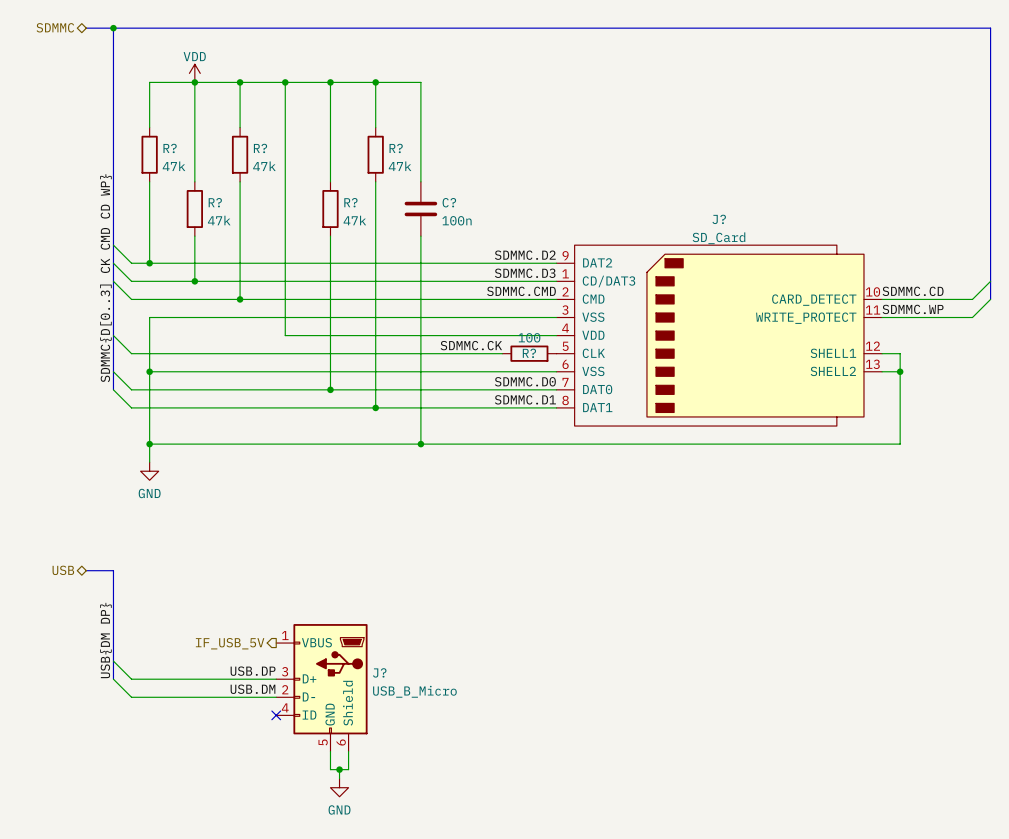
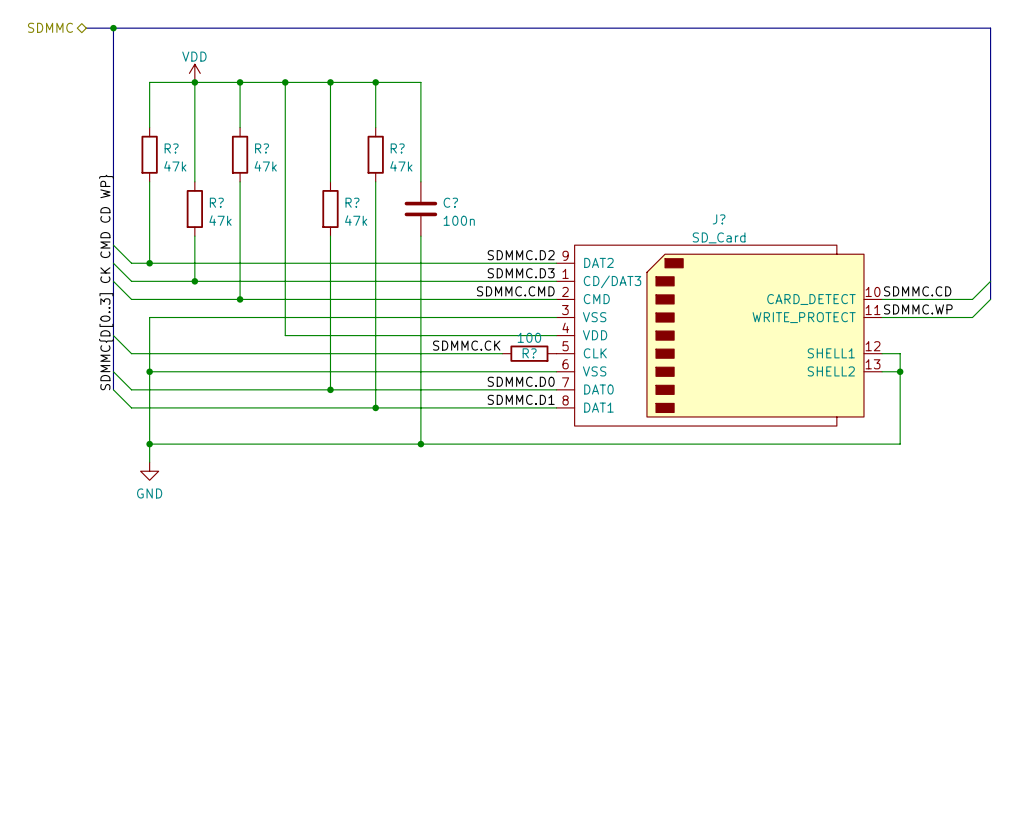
hierarchical label: USB (63, 570) -> none
bus: (86, 570) (113, 570) (113, 679) -> none
label: USB{DM DP} (105, 640) -> none
hierarchical label: IF_USB_5V (230, 643) -> none
wire: (113, 661) (131, 679) (276, 679) -> none
label: USB.DP (253, 671) -> none
wire: (113, 679) (131, 697) (276, 697) -> none
J?: USB_B_Micro (321, 687) -> none
label: USB.DM (252, 689) -> none
no-connect mark: (276, 715) -> none
wire: (330, 751) (330, 769) (348, 769) (348, 751) -> none
wire: (339, 769) (339, 778) -> none
junction: (339, 769) -> none
power symbol: GND (339, 787) -> none

